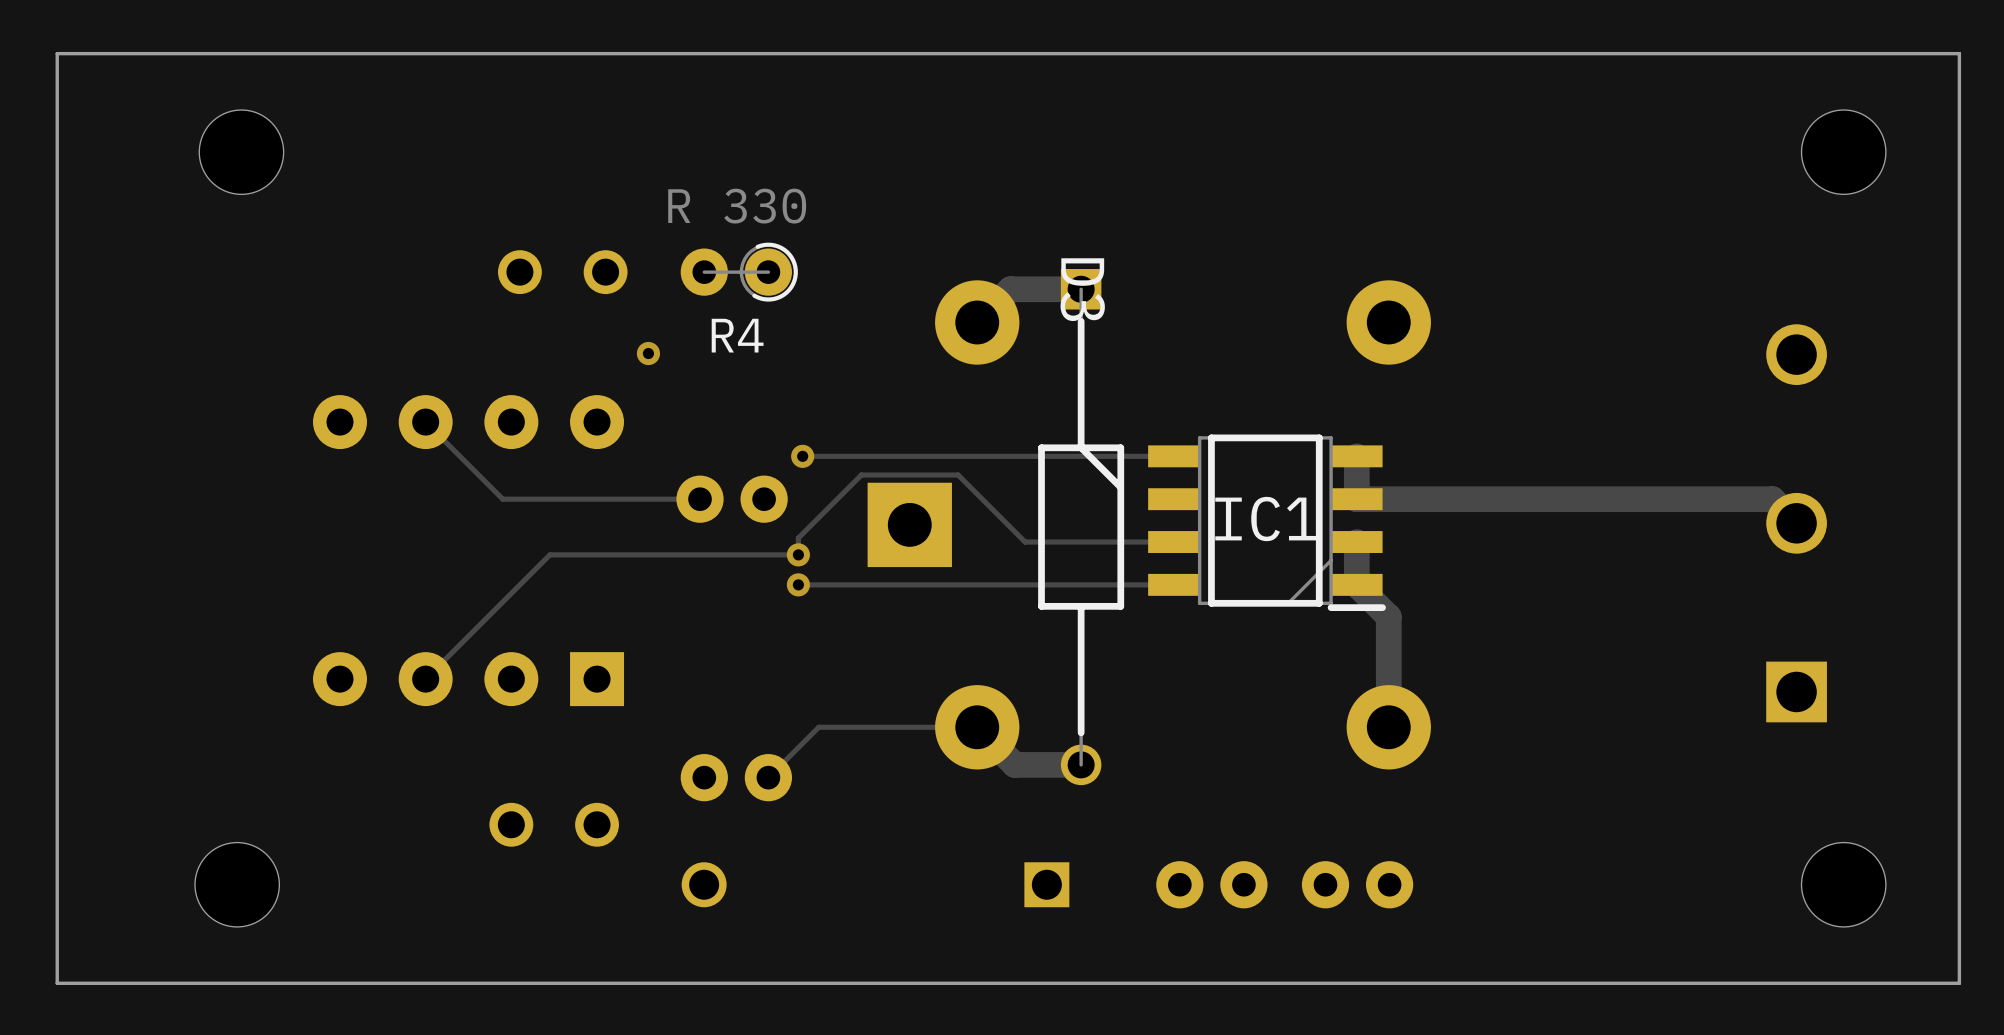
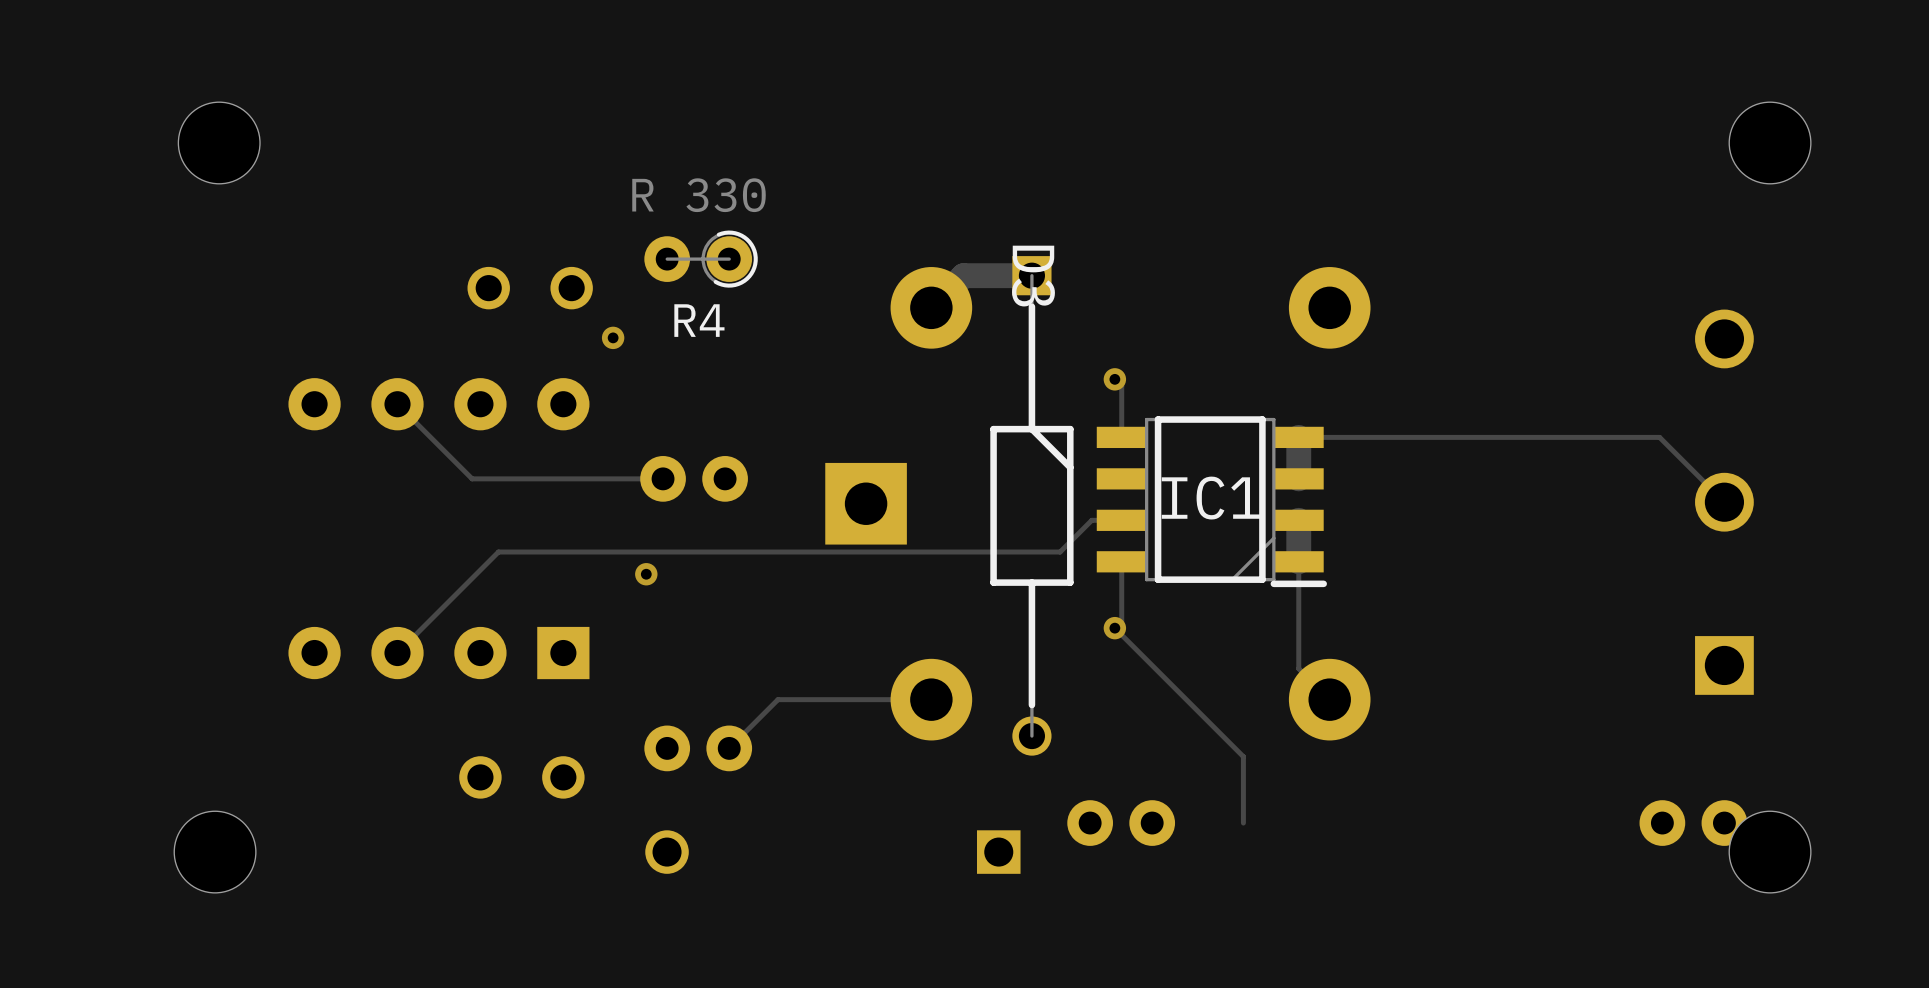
board edge: (1959, 53) (57, 53) (57, 983) (1959, 983) (1959, 53) -> none
part position: (562, 272) -> (530, 288)
via: none -> (1114, 379)
via: (802, 456) -> none
track: (1173, 456) (802, 456) -> (1121, 437) (1121, 386) (1114, 379)
track: (1772, 499) (1356, 499) -> (1701, 478) (1659, 437) (1298, 437)
track: (1142, 542) (1025, 542) (958, 475) (861, 475) (798, 538) (798, 554) (549, 554) (530, 574) -> (1091, 520) (1060, 552) (498, 552)
via: (798, 554) -> none
via: (798, 584) -> none
track: (1173, 584) (798, 584) -> (1121, 561) (1121, 621) (1114, 628) (1243, 756) (1243, 823)
track: (1356, 584) (1388, 616) (1388, 727) -> (1298, 561) (1298, 668) (1329, 699)
via: none -> (646, 574)
via: none -> (1114, 628)
track: (977, 727) (1014, 764) (1081, 764) -> none
part position: (554, 824) -> (521, 777)
part: none -> (1693, 823)
part position: (1211, 884) -> (1121, 823)
part: (1357, 884) -> none

